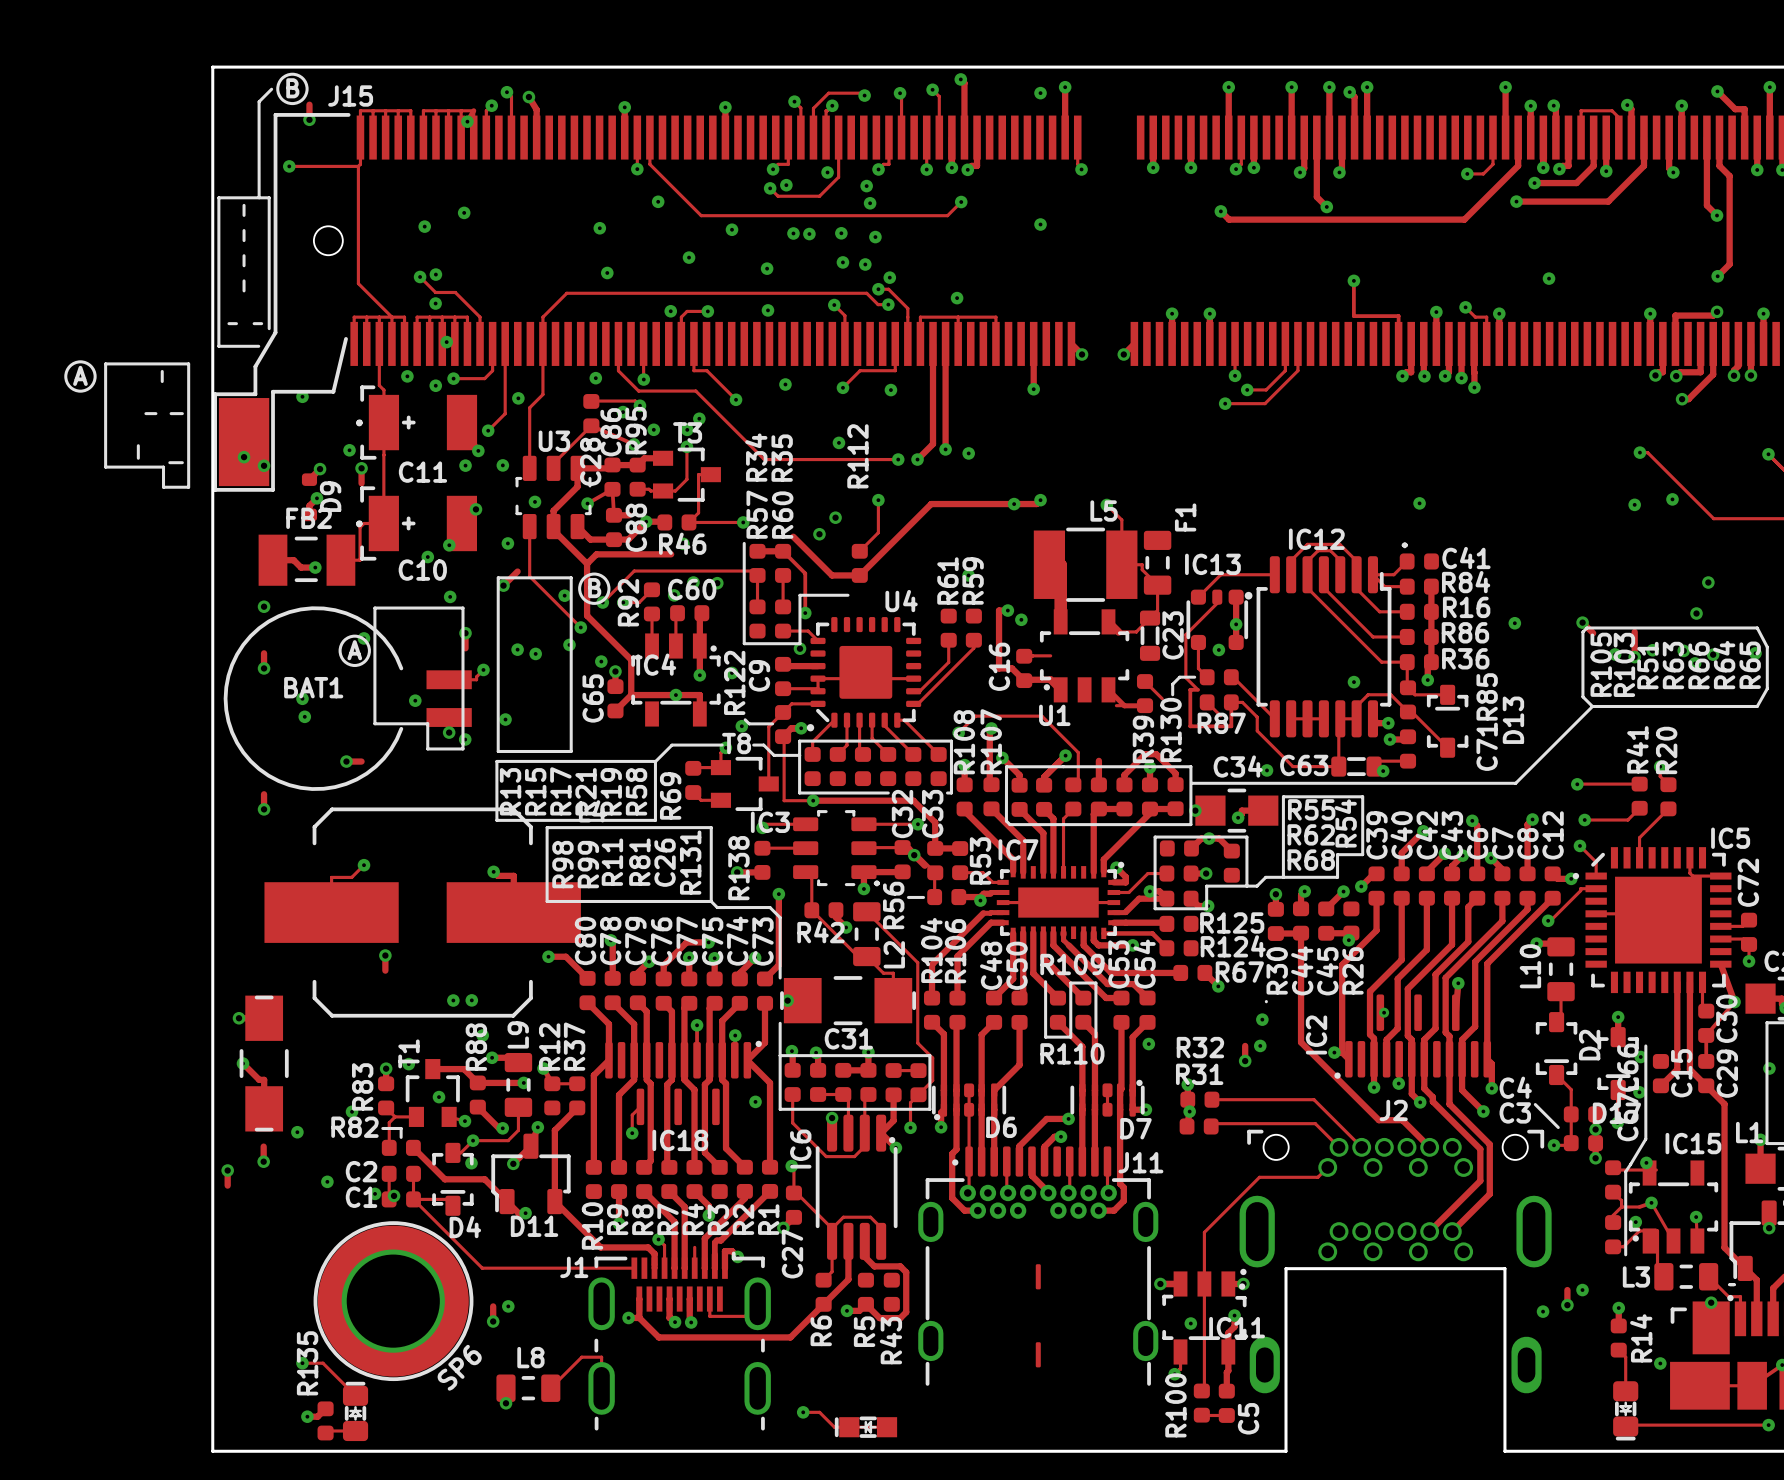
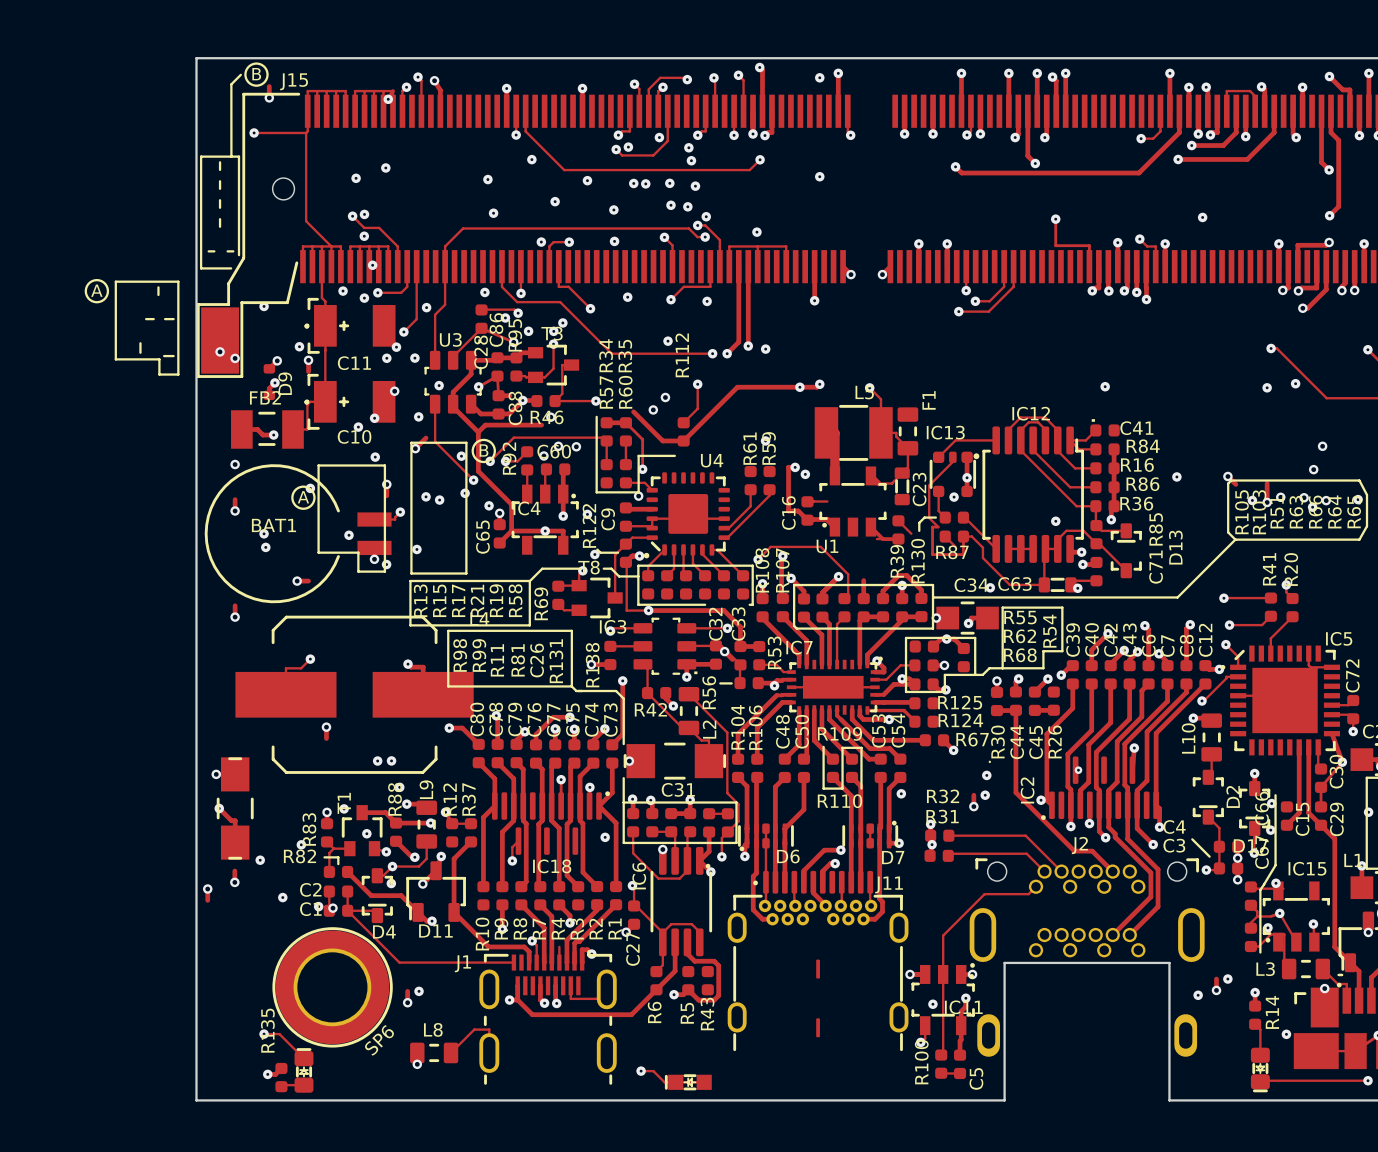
via: (1348, 940) -> none

